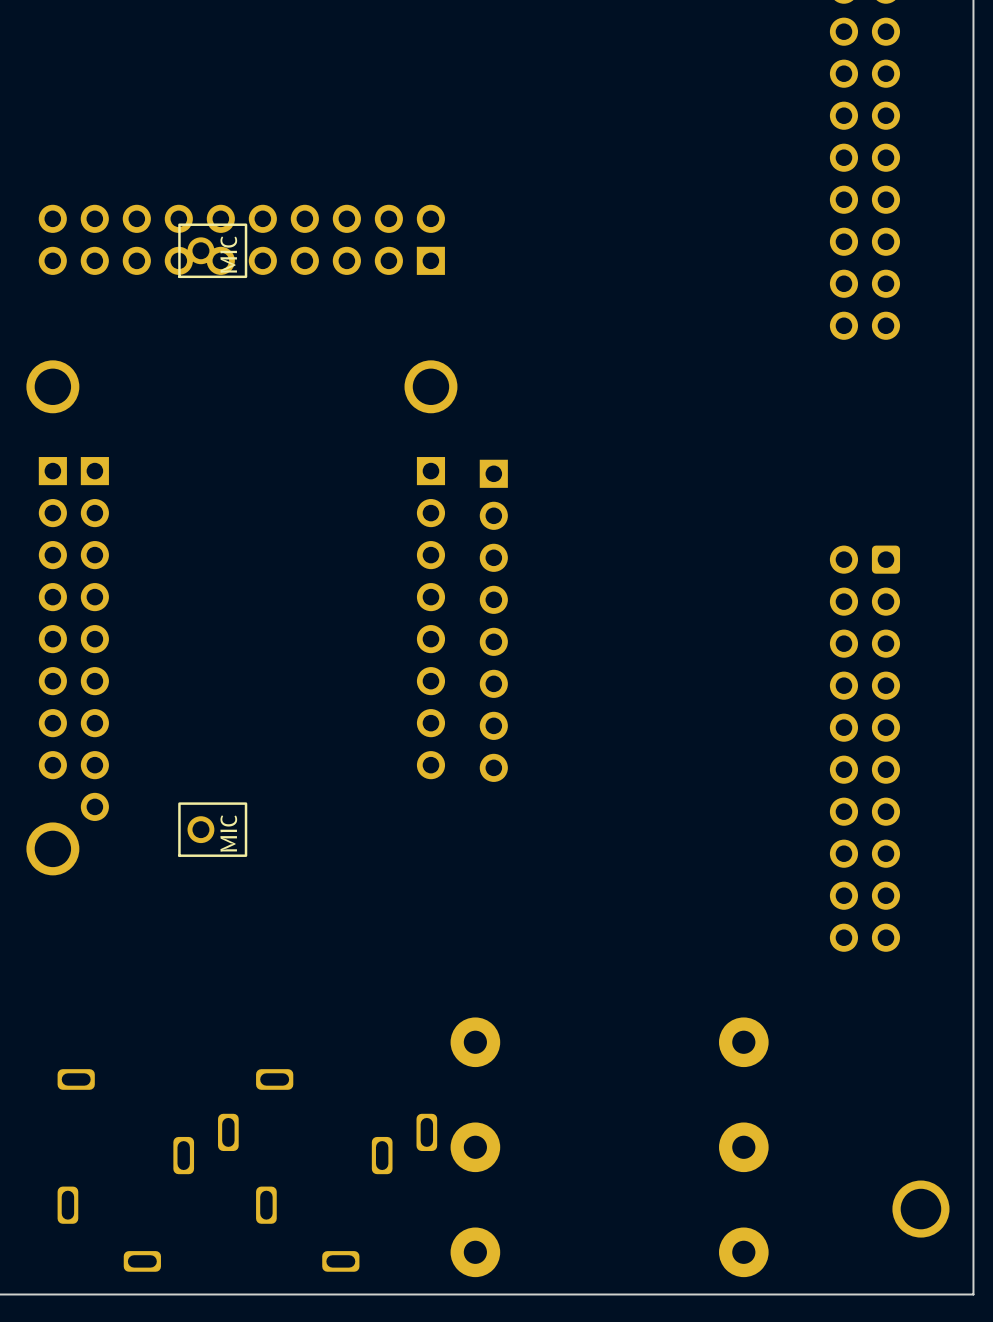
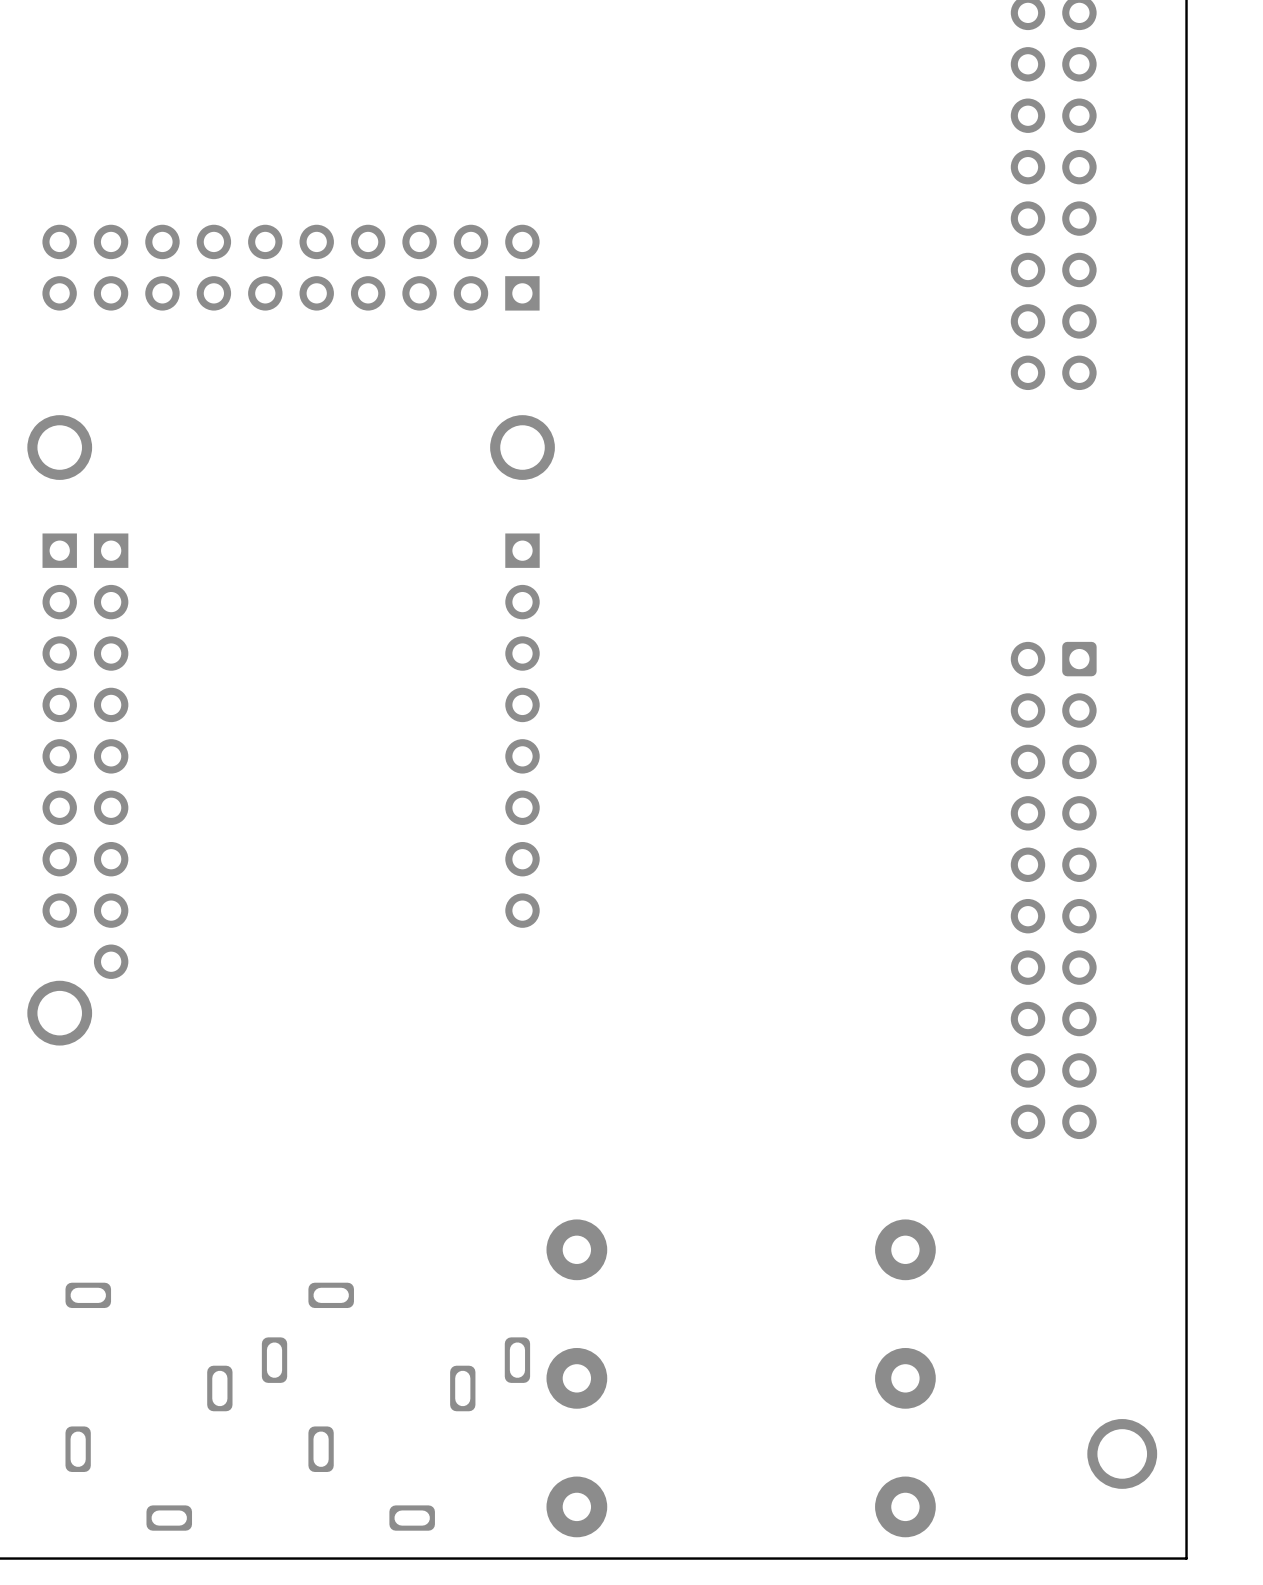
part: (212, 250) -> none
part: (493, 620) -> none
part: (212, 829) -> none

